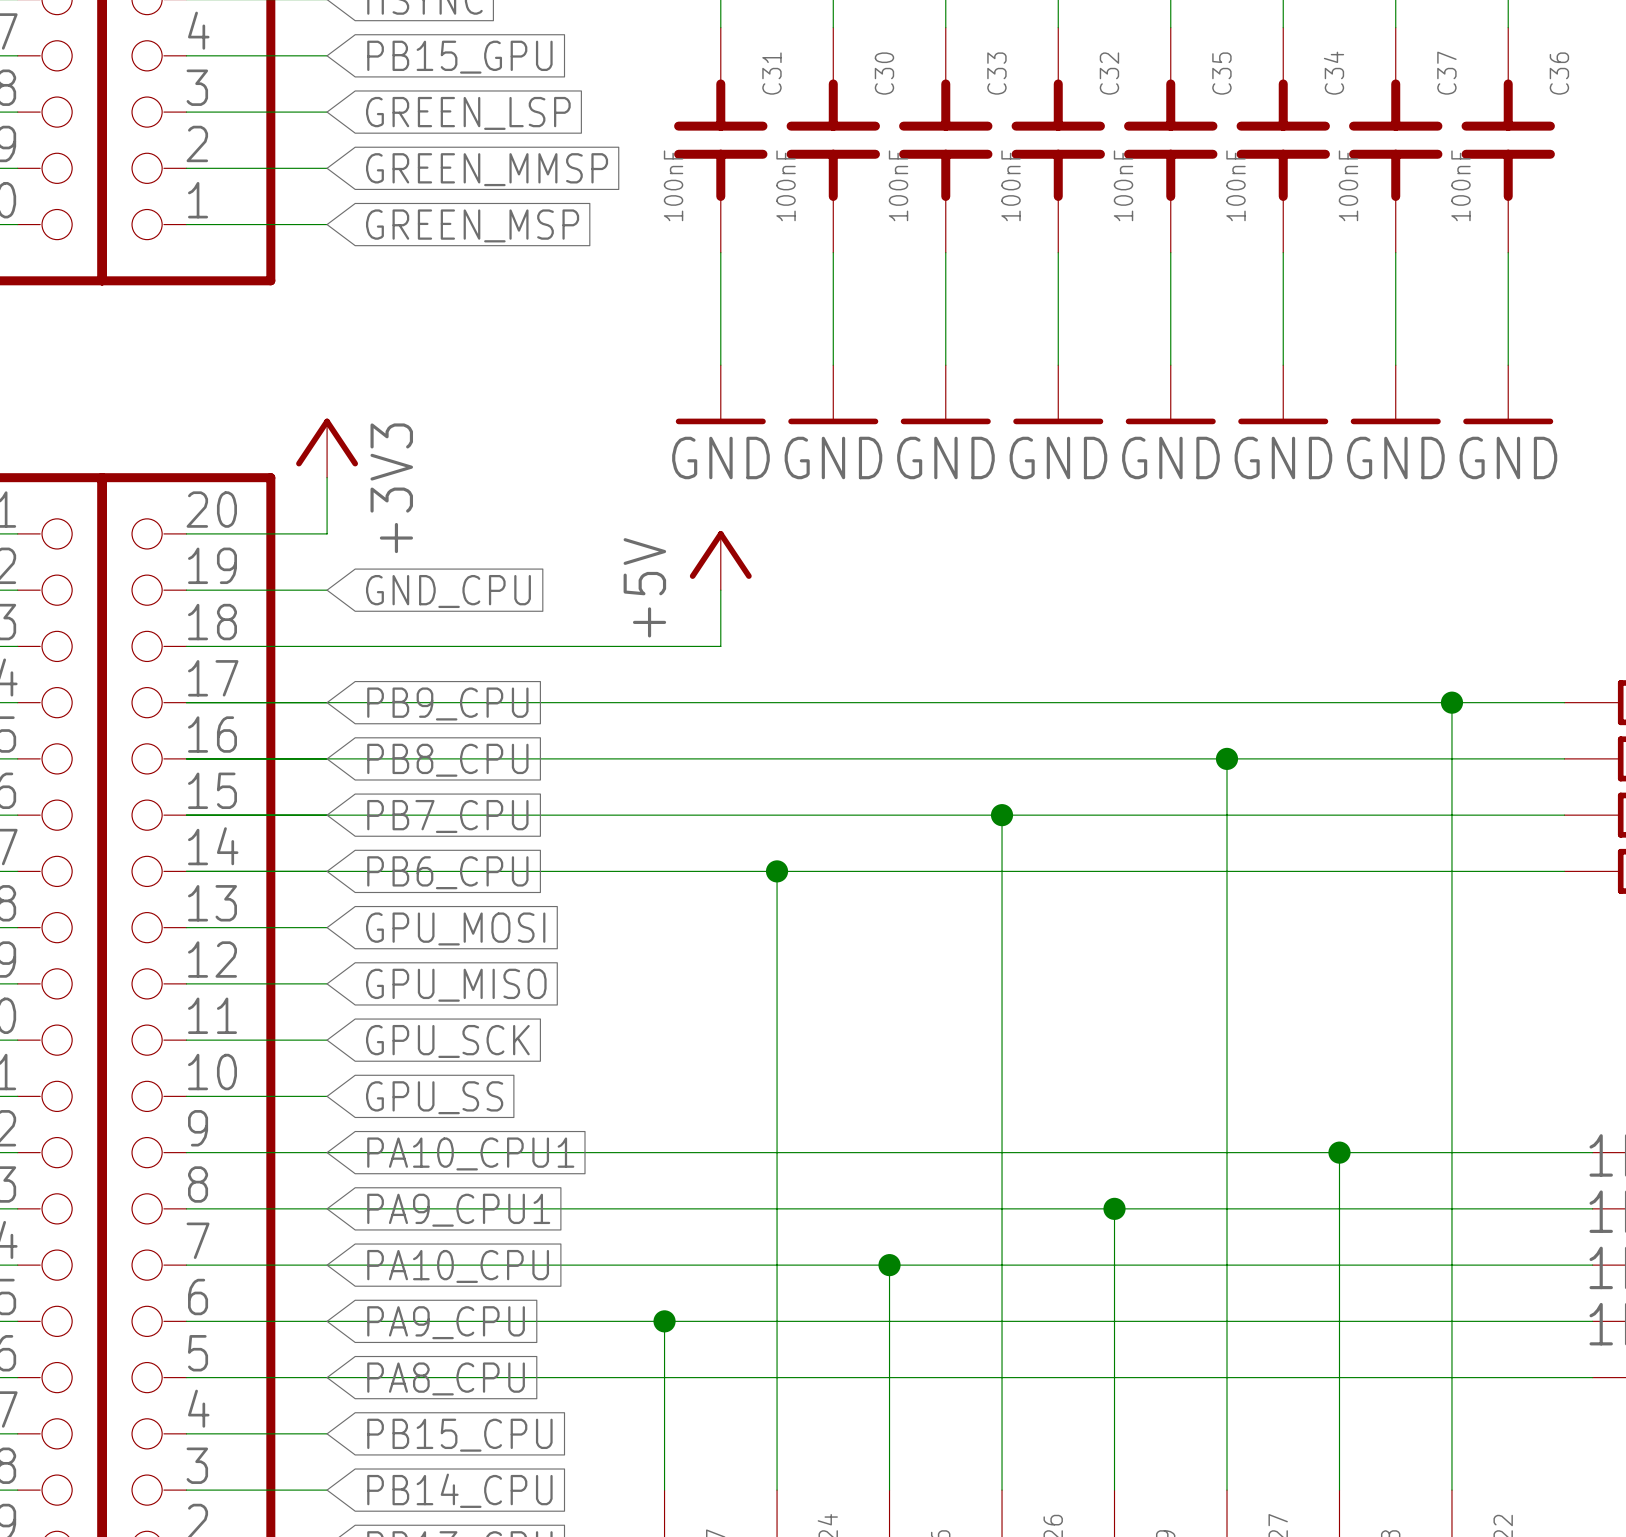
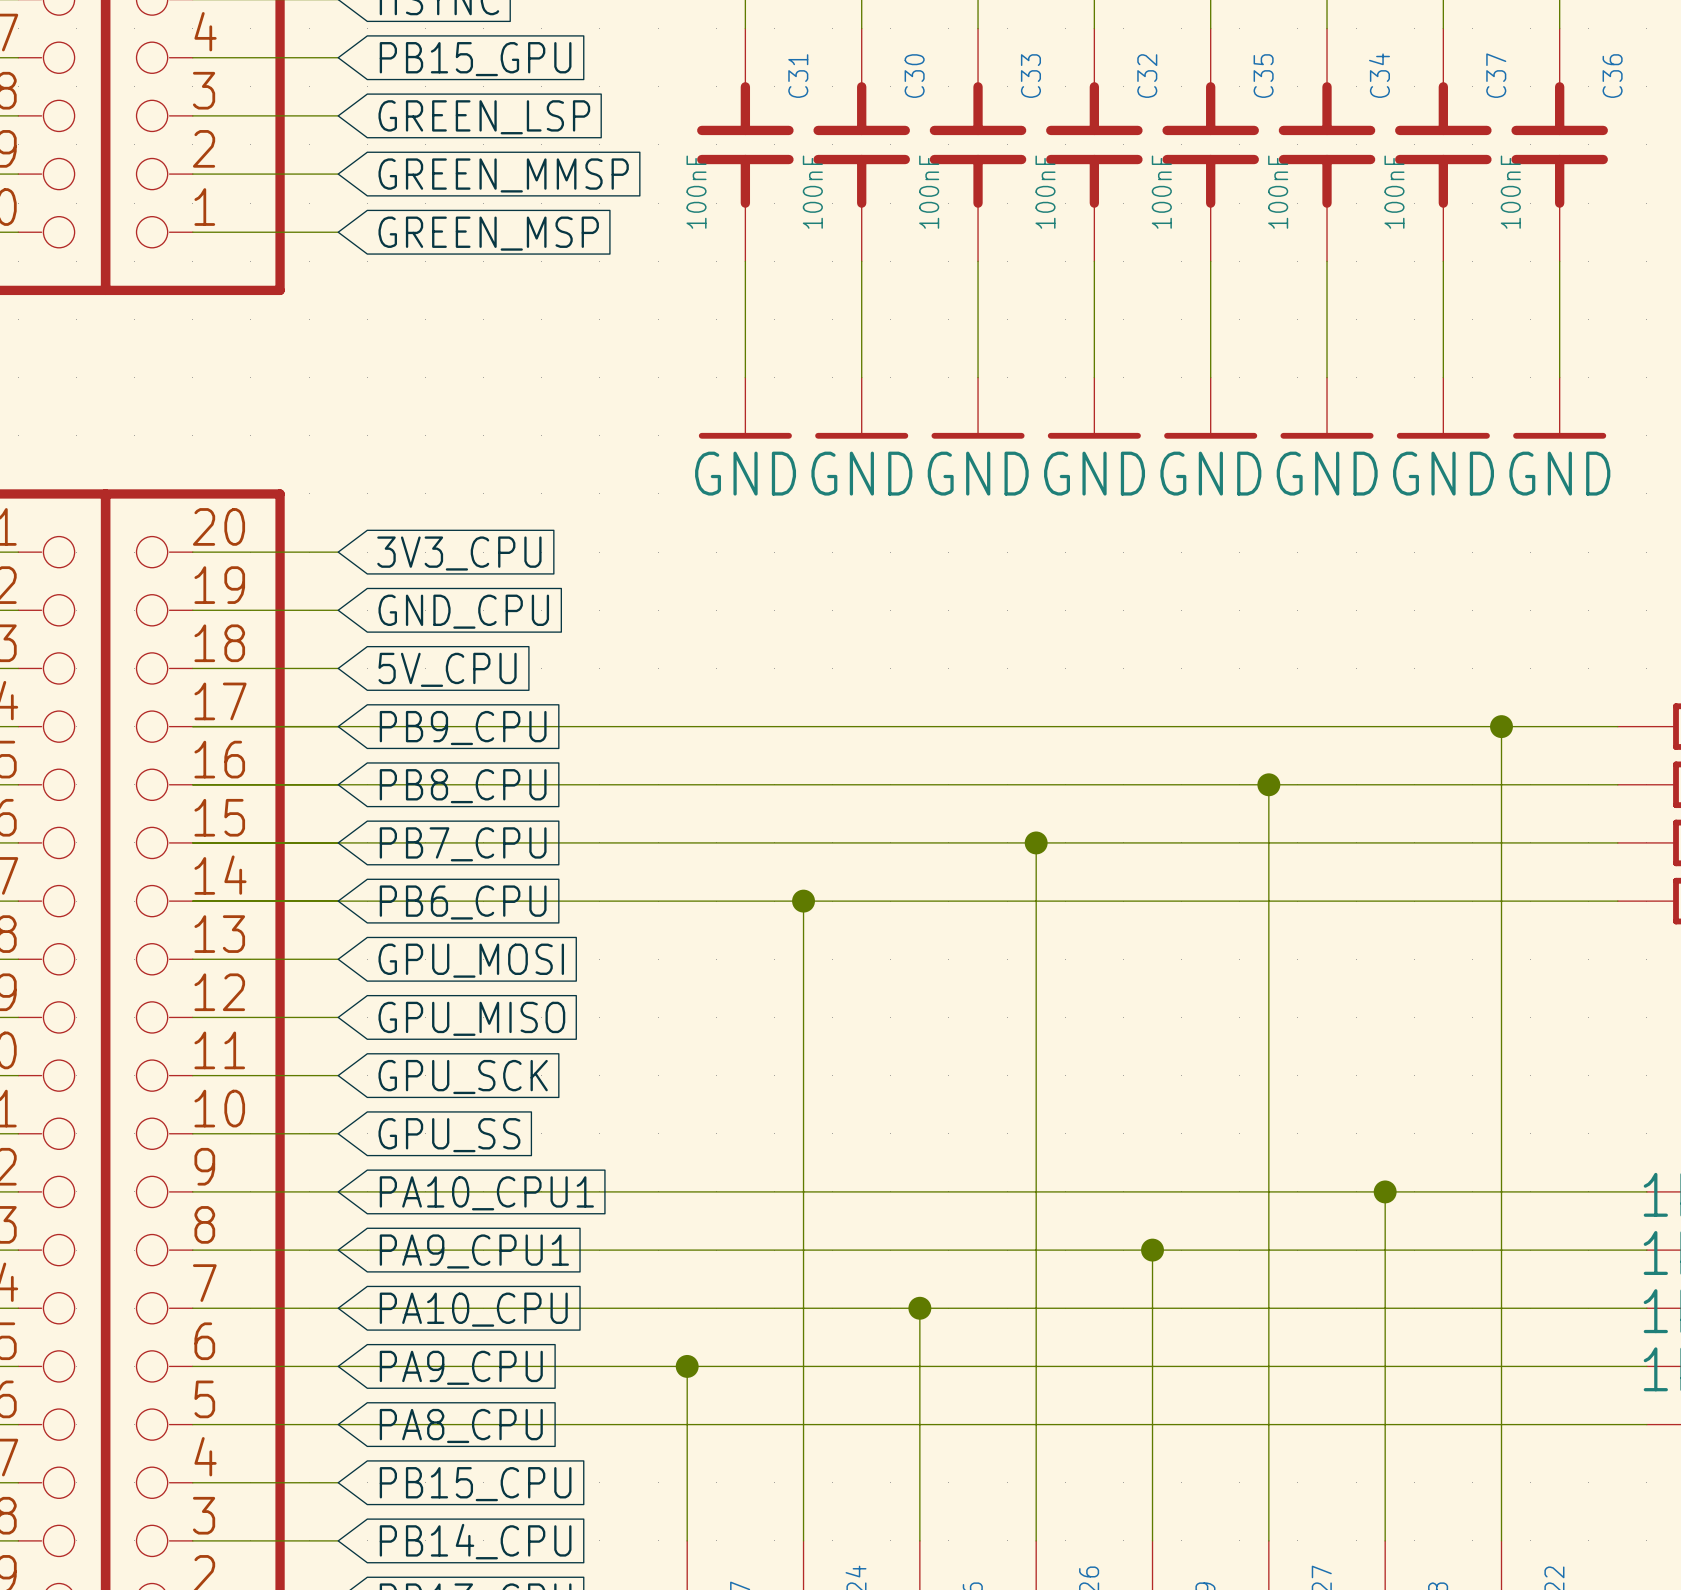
power symbol: +3V3 (327, 448) -> none
wire: (327, 477) (327, 533) -> none
global label: none -> 3V3_CPU (459, 553)
power symbol: +5V (720, 560) -> none
wire: (720, 590) (720, 646) (327, 646) -> none
global label: none -> 5V_CPU (447, 669)

